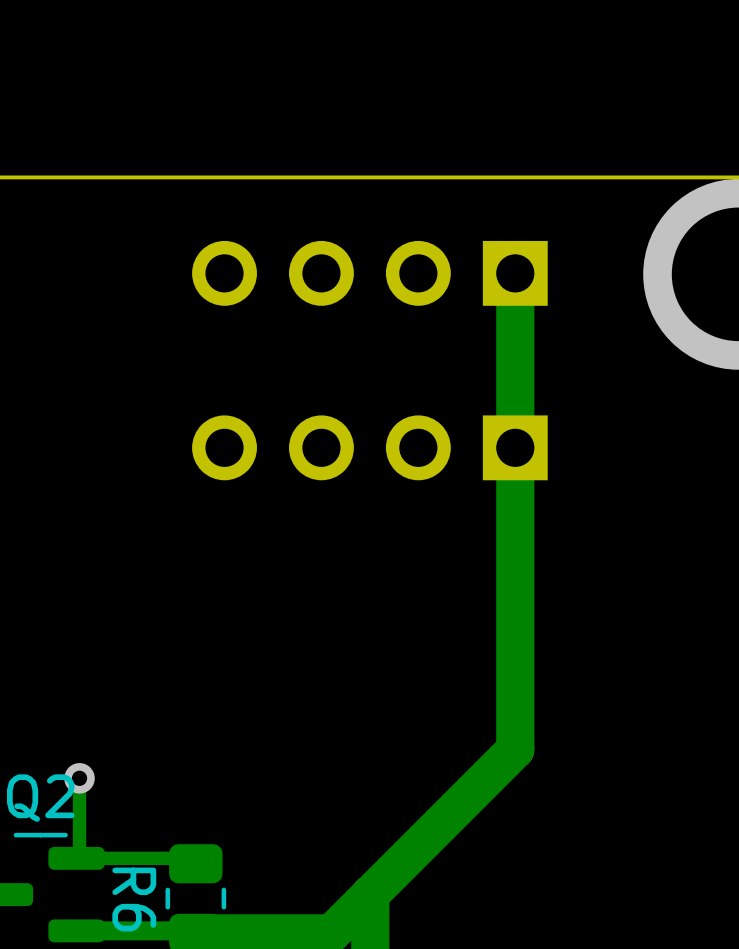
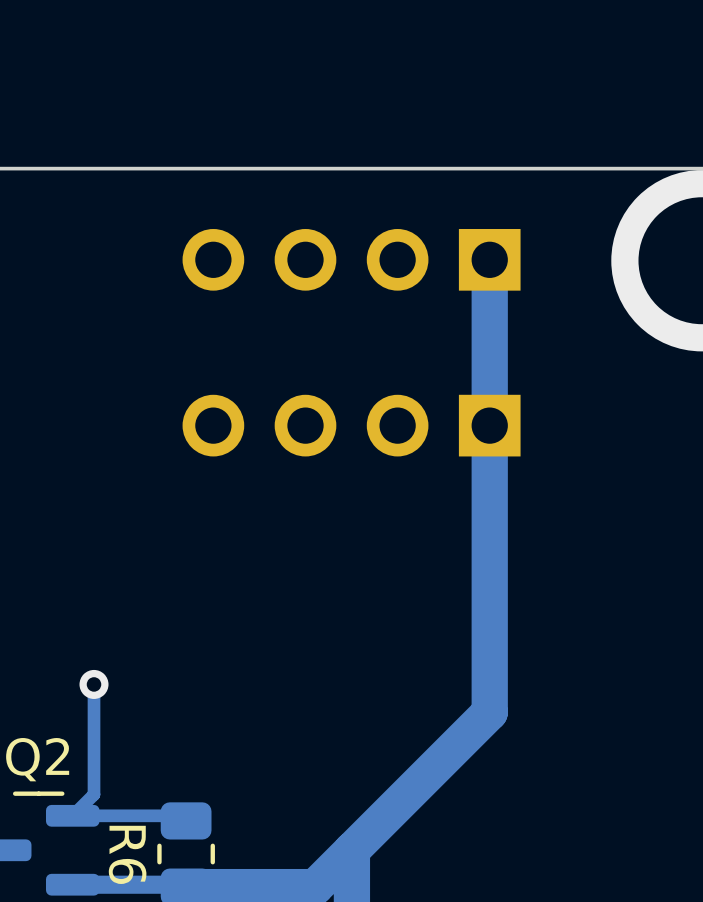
track: (79, 778) (79, 855) -> (94, 684) (94, 794) (75, 812)
via position: (79, 778) -> (94, 684)

